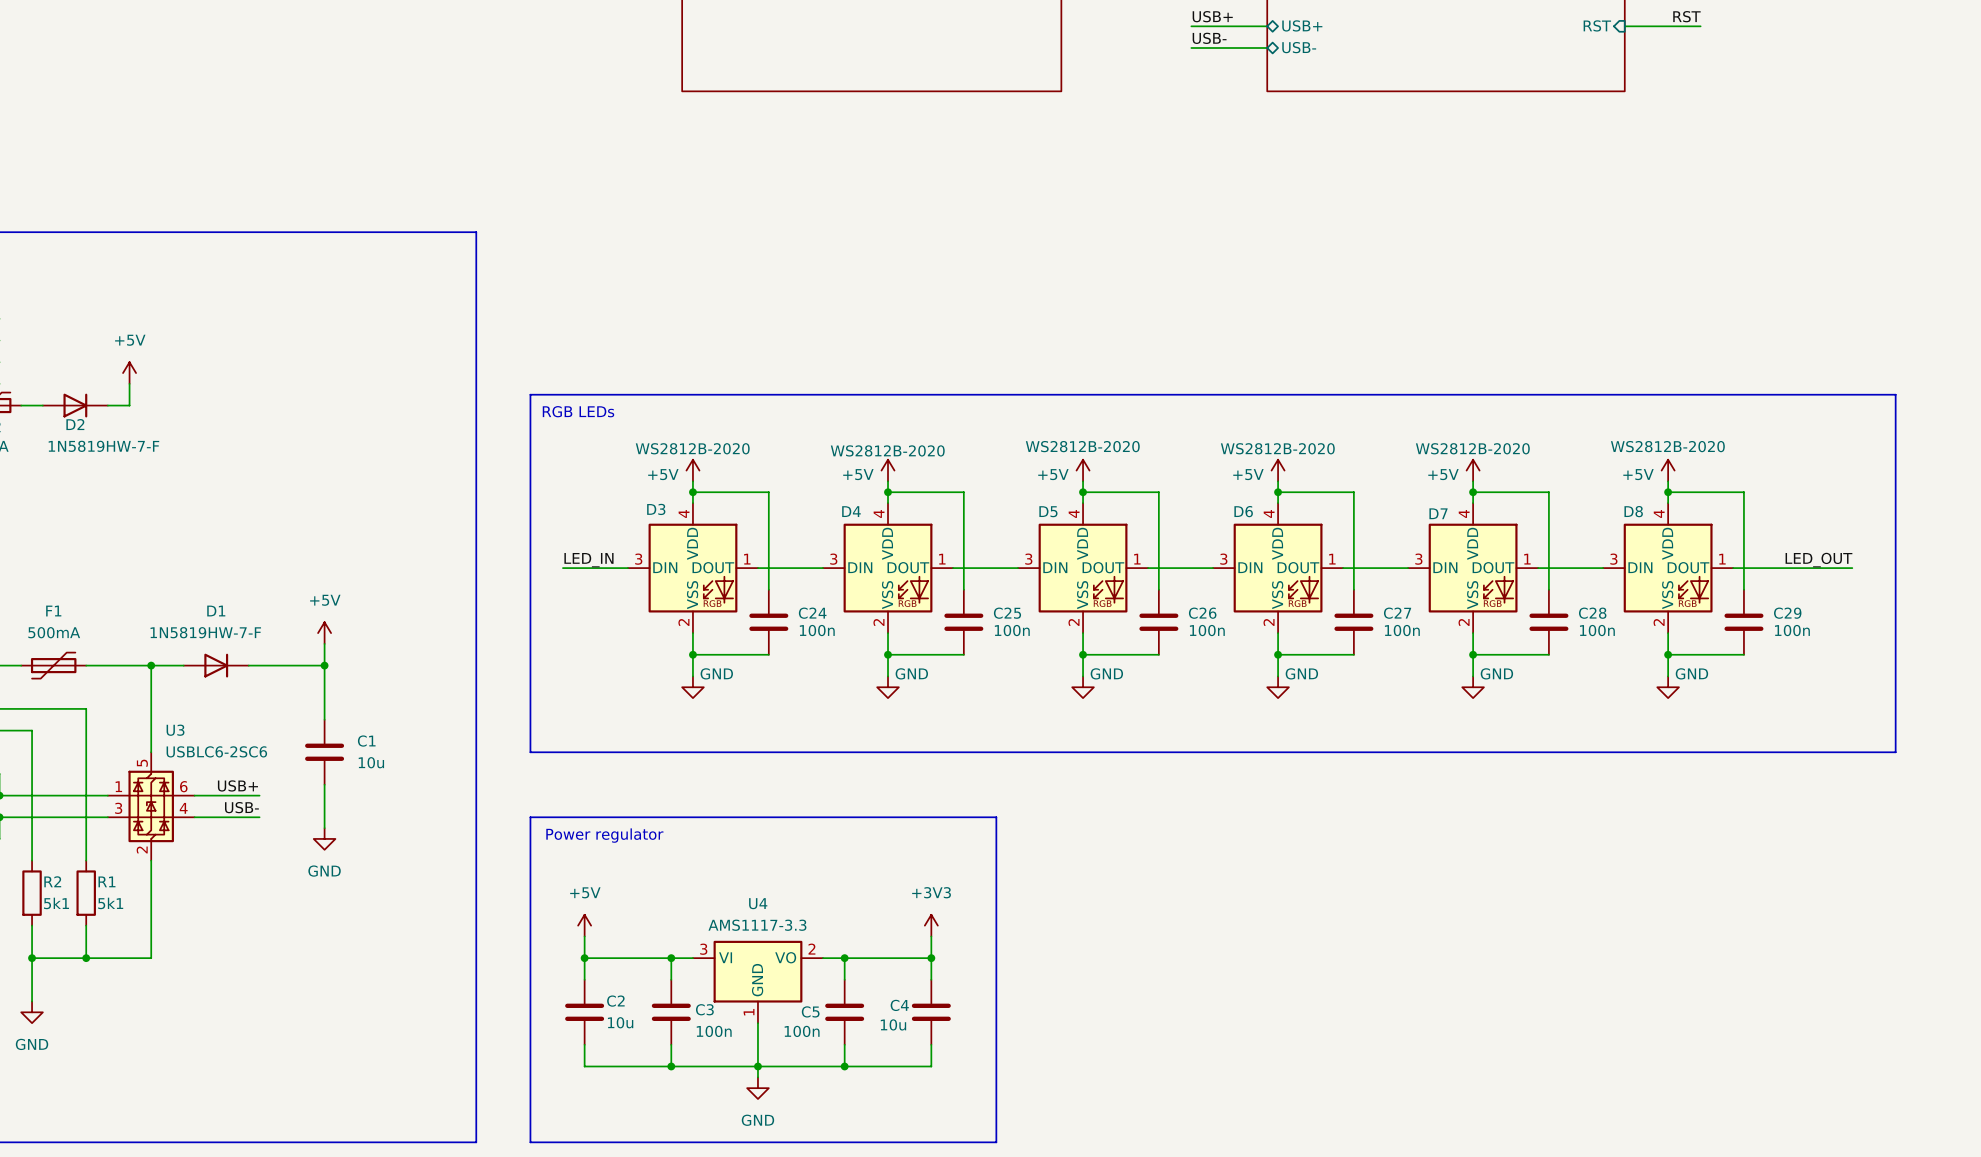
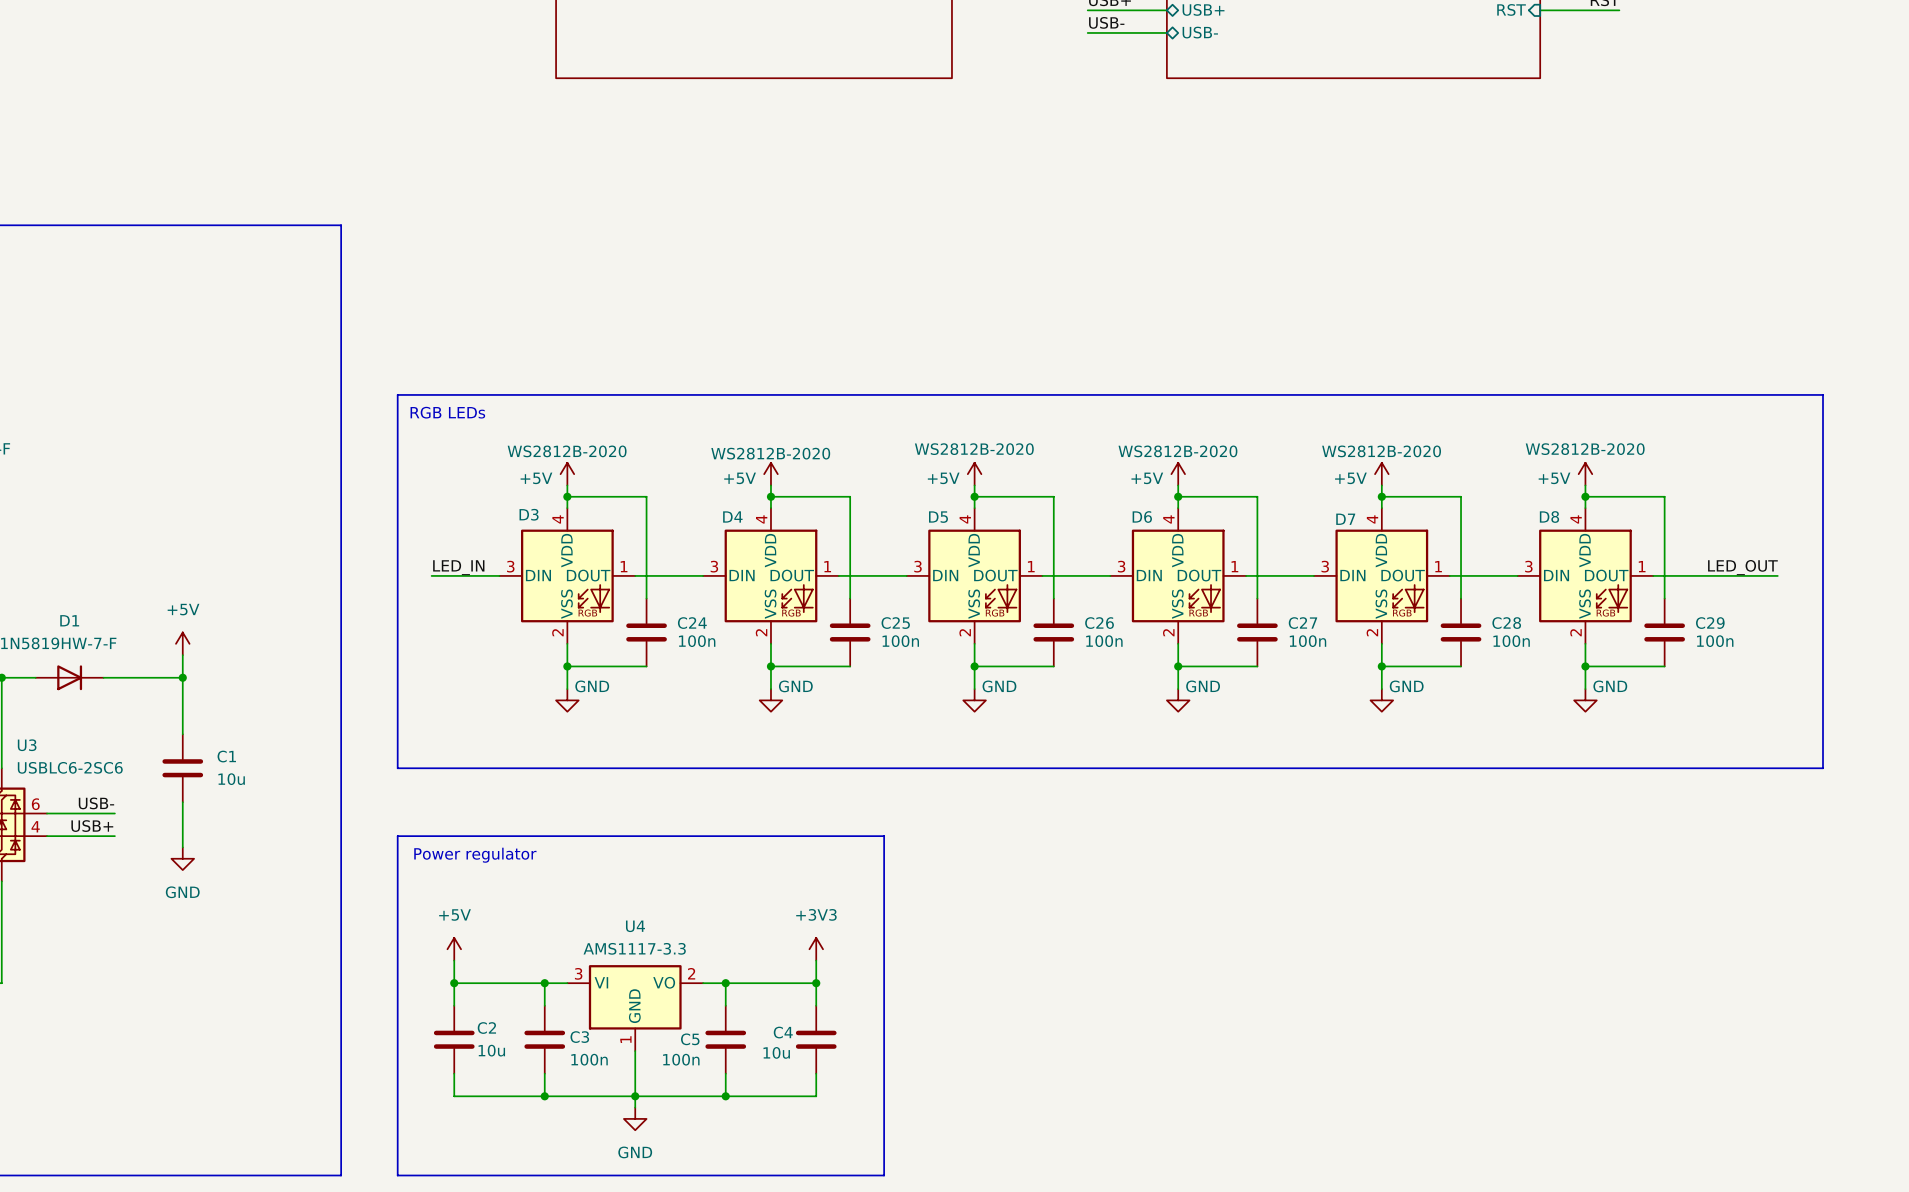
label: USB+ (237, 785) -> USB- (96, 803)
label: USB- (241, 807) -> USB+ (92, 826)

